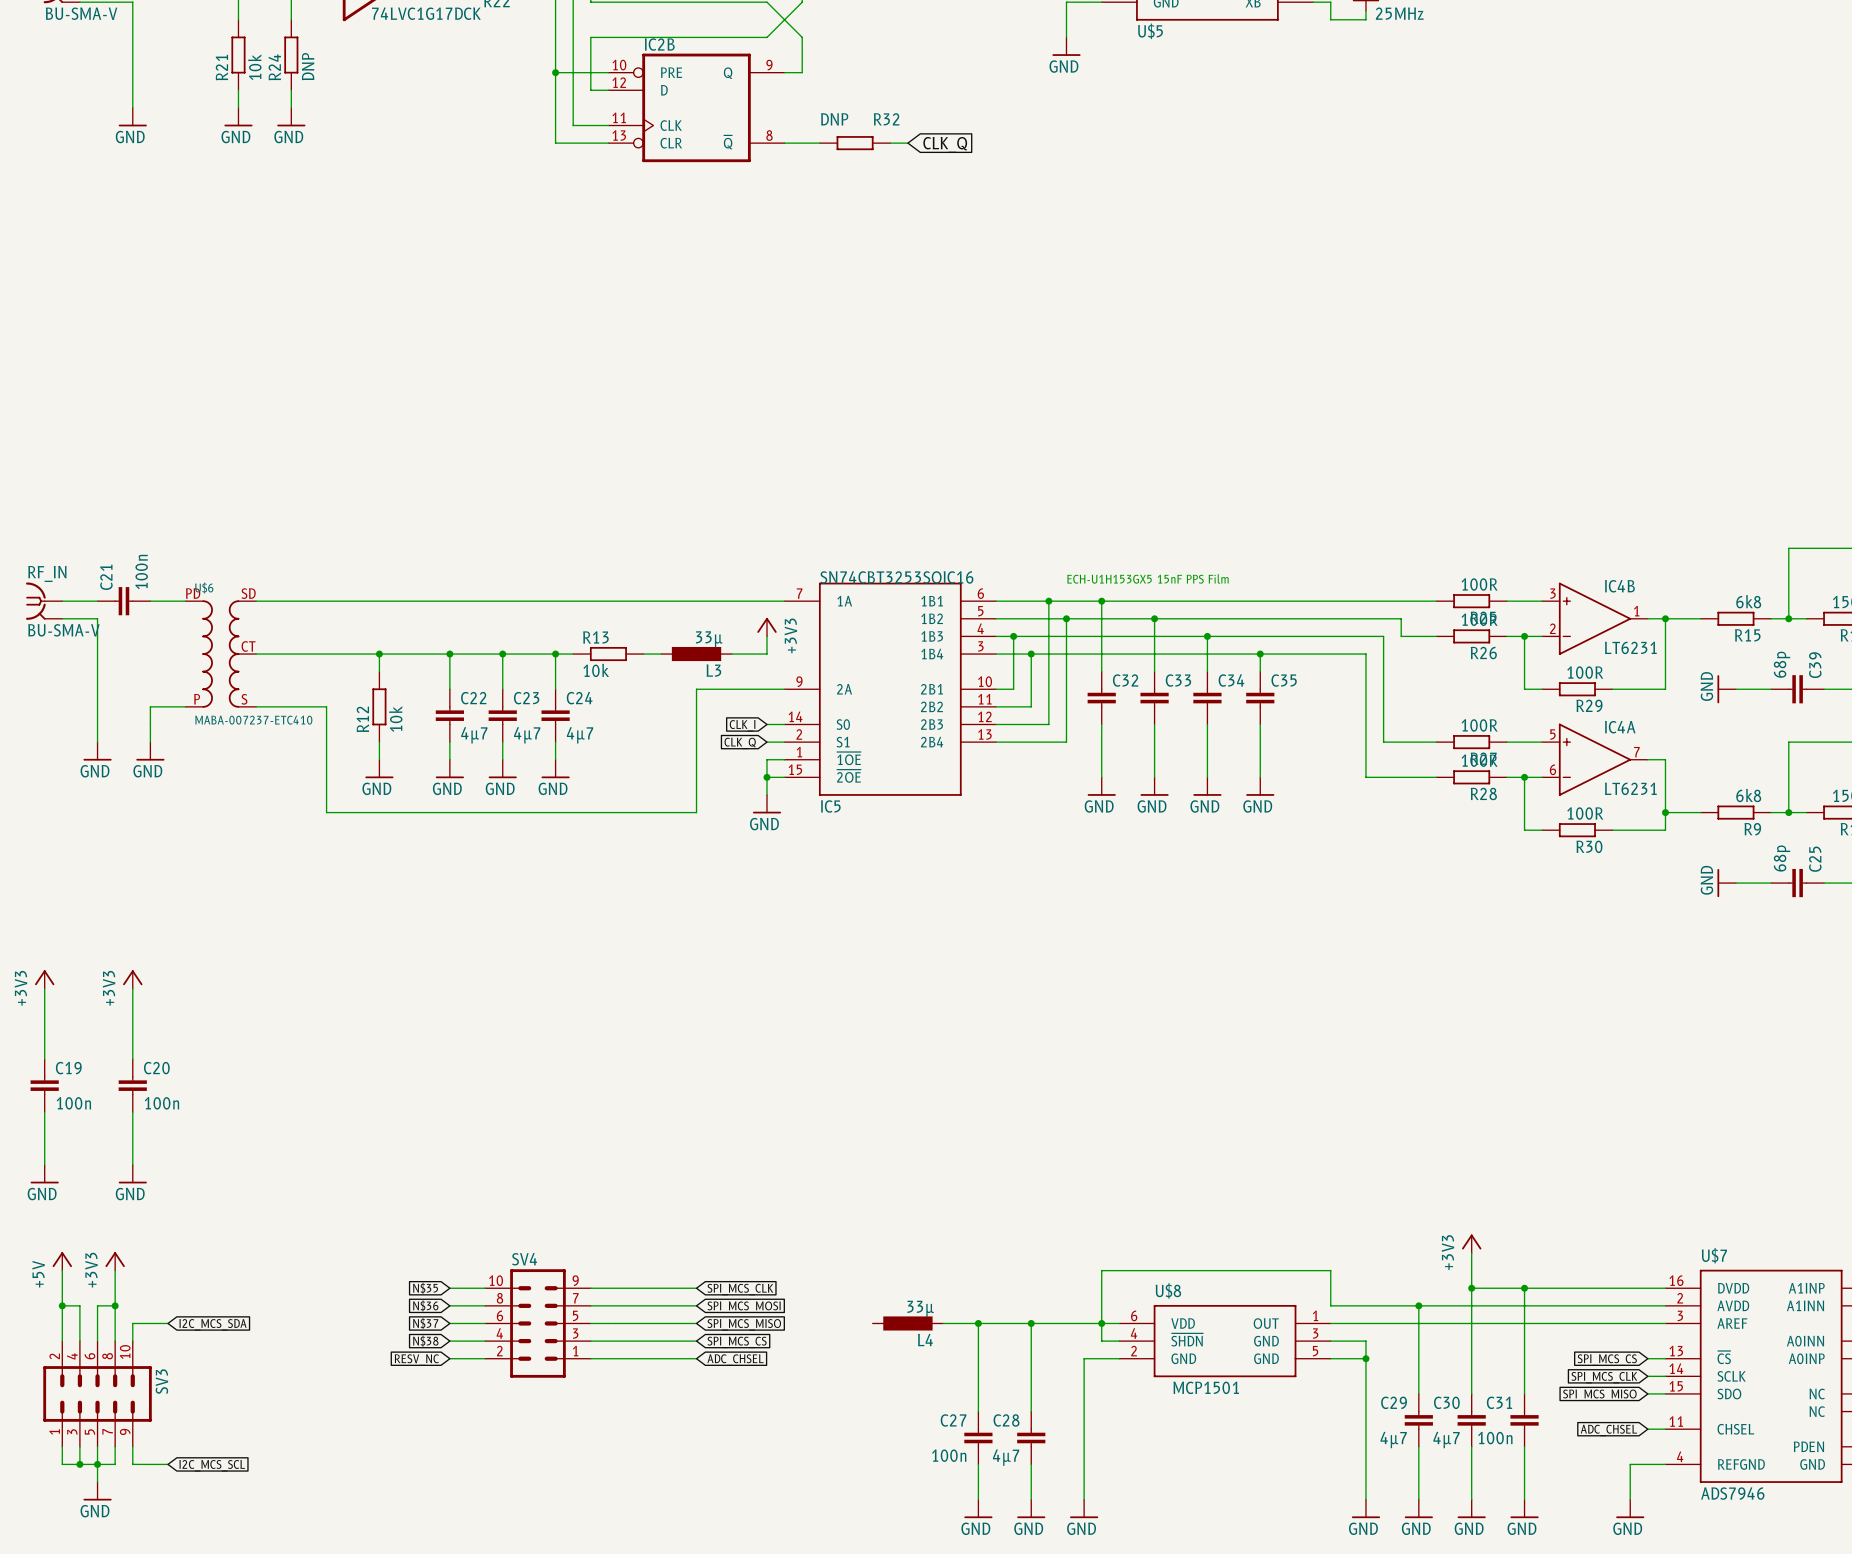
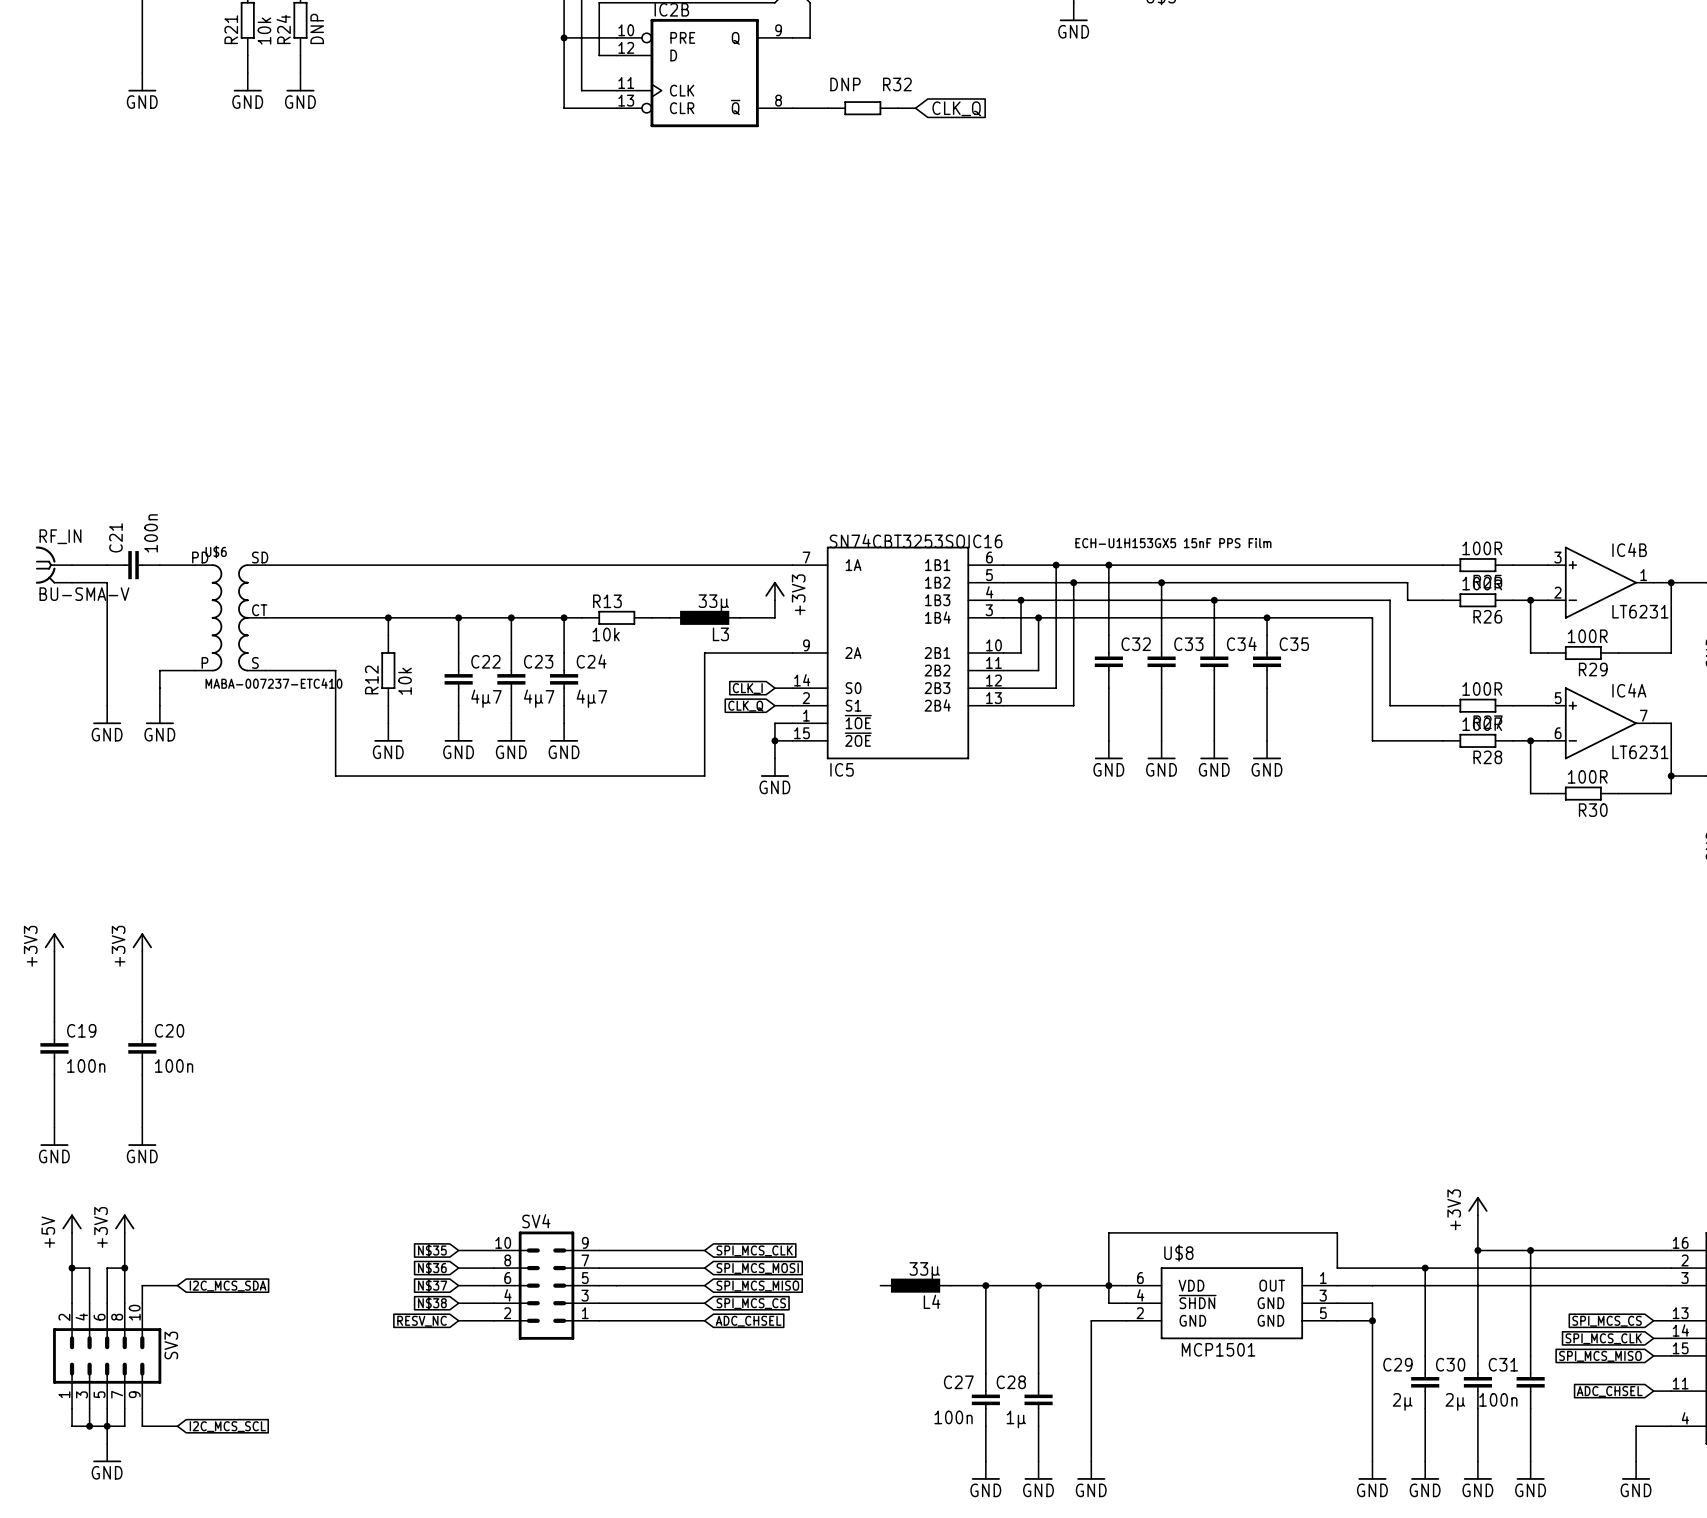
C29 value: 4µ7 (1393, 1440) -> 2µ (1402, 1401)
C30 value: 4µ7 (1446, 1440) -> 2µ (1455, 1401)
C28 value: 4µ7 (1006, 1457) -> 1µ (1016, 1419)

